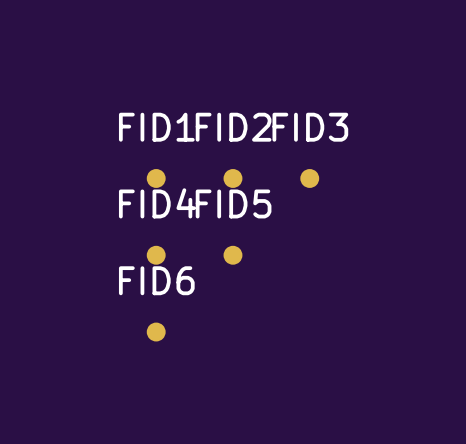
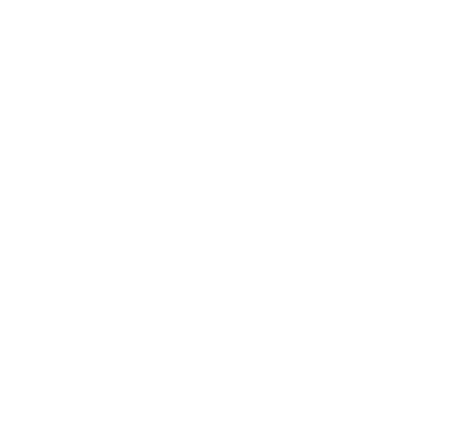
FID1: (156, 178) -> none
FID2: (232, 178) -> none
FID3: (309, 178) -> none
FID4: (156, 255) -> none
FID5: (232, 255) -> none
FID6: (156, 332) -> none

